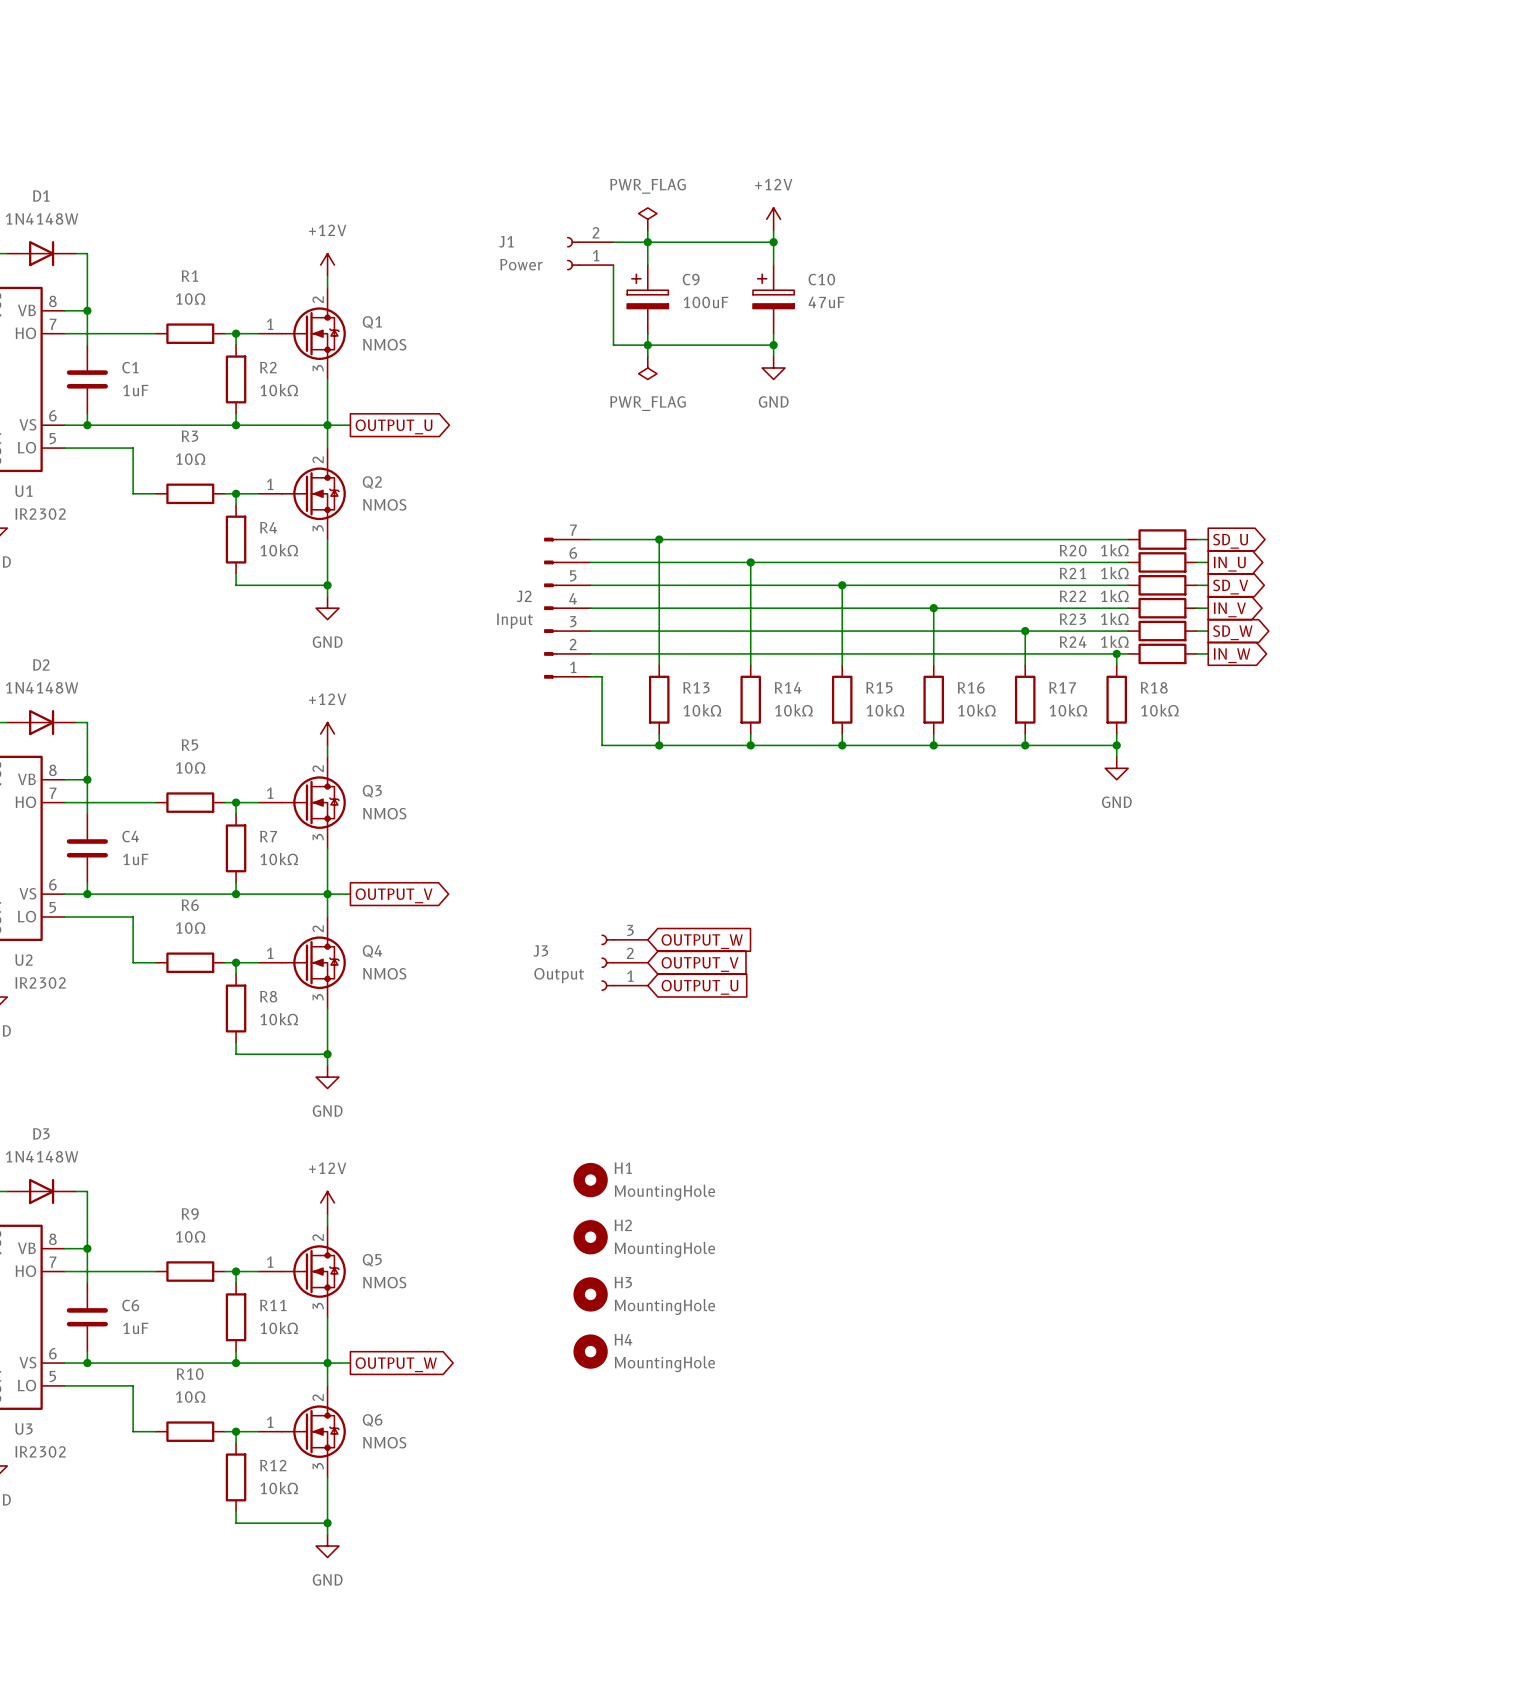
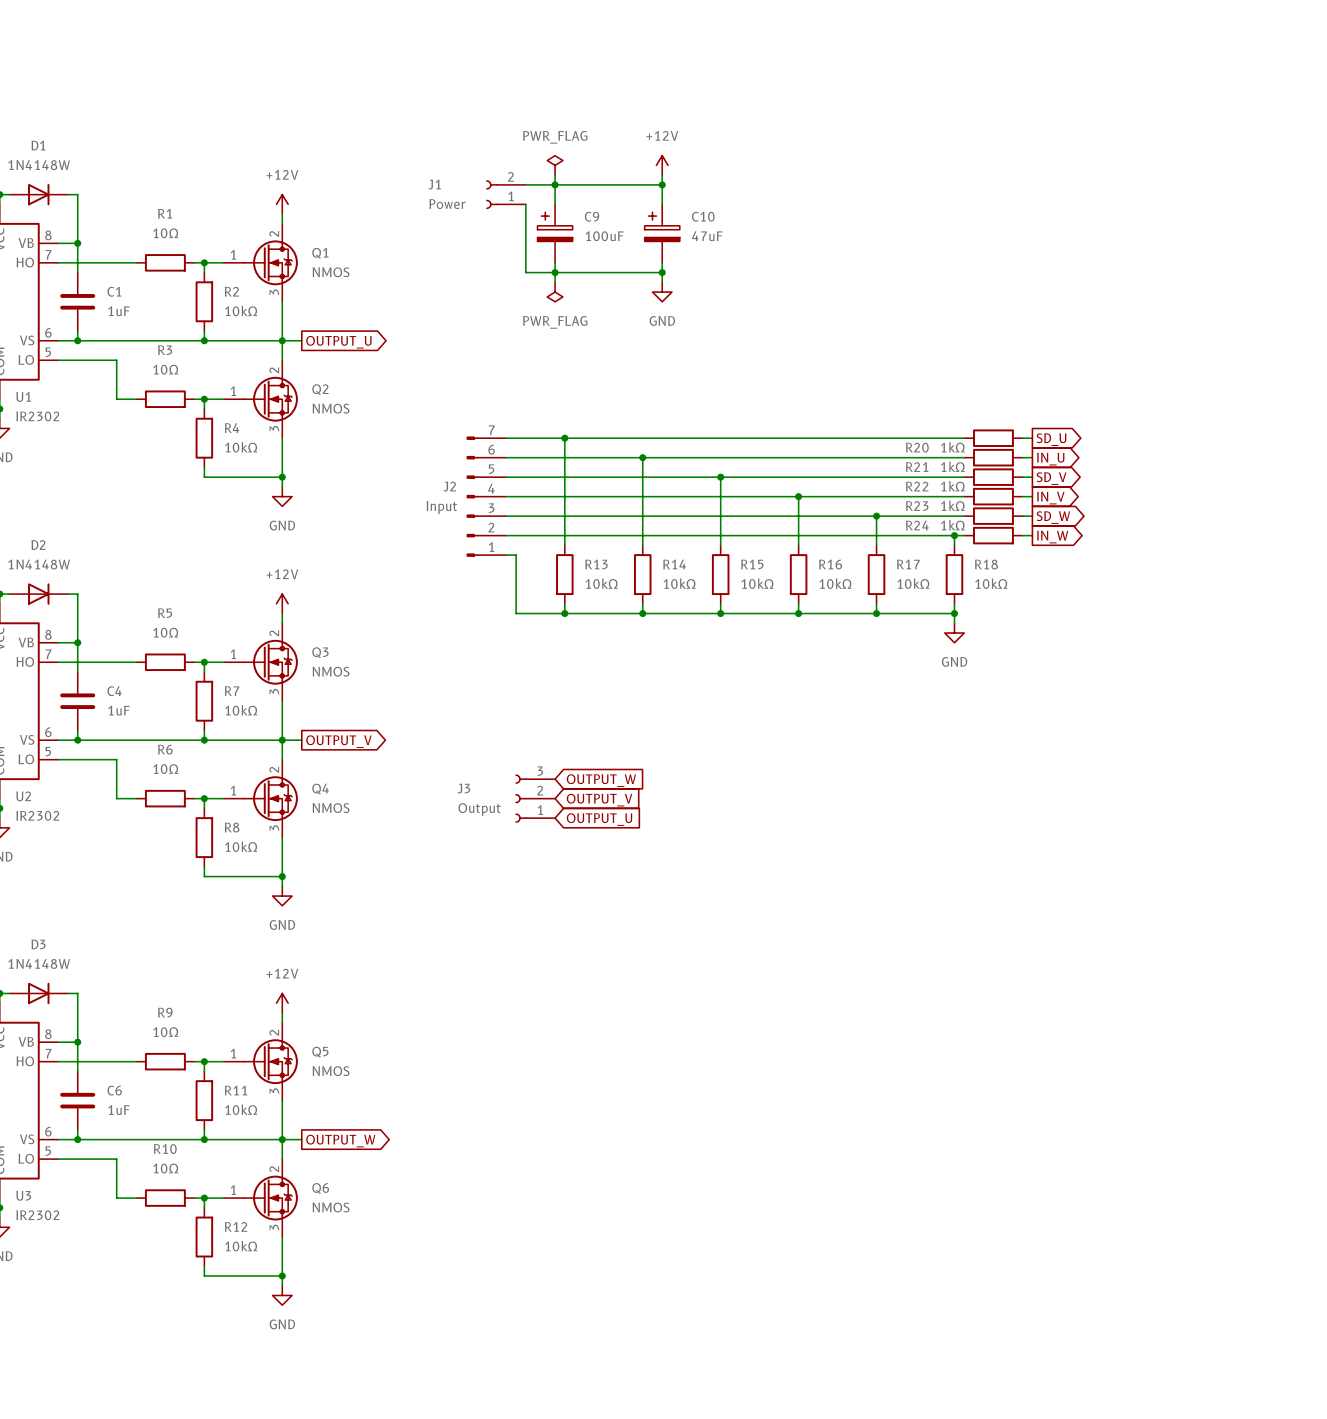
H1: MountingHole (590, 1180) -> none
H2: MountingHole (590, 1237) -> none
H3: MountingHole (590, 1294) -> none
H4: MountingHole (590, 1351) -> none

